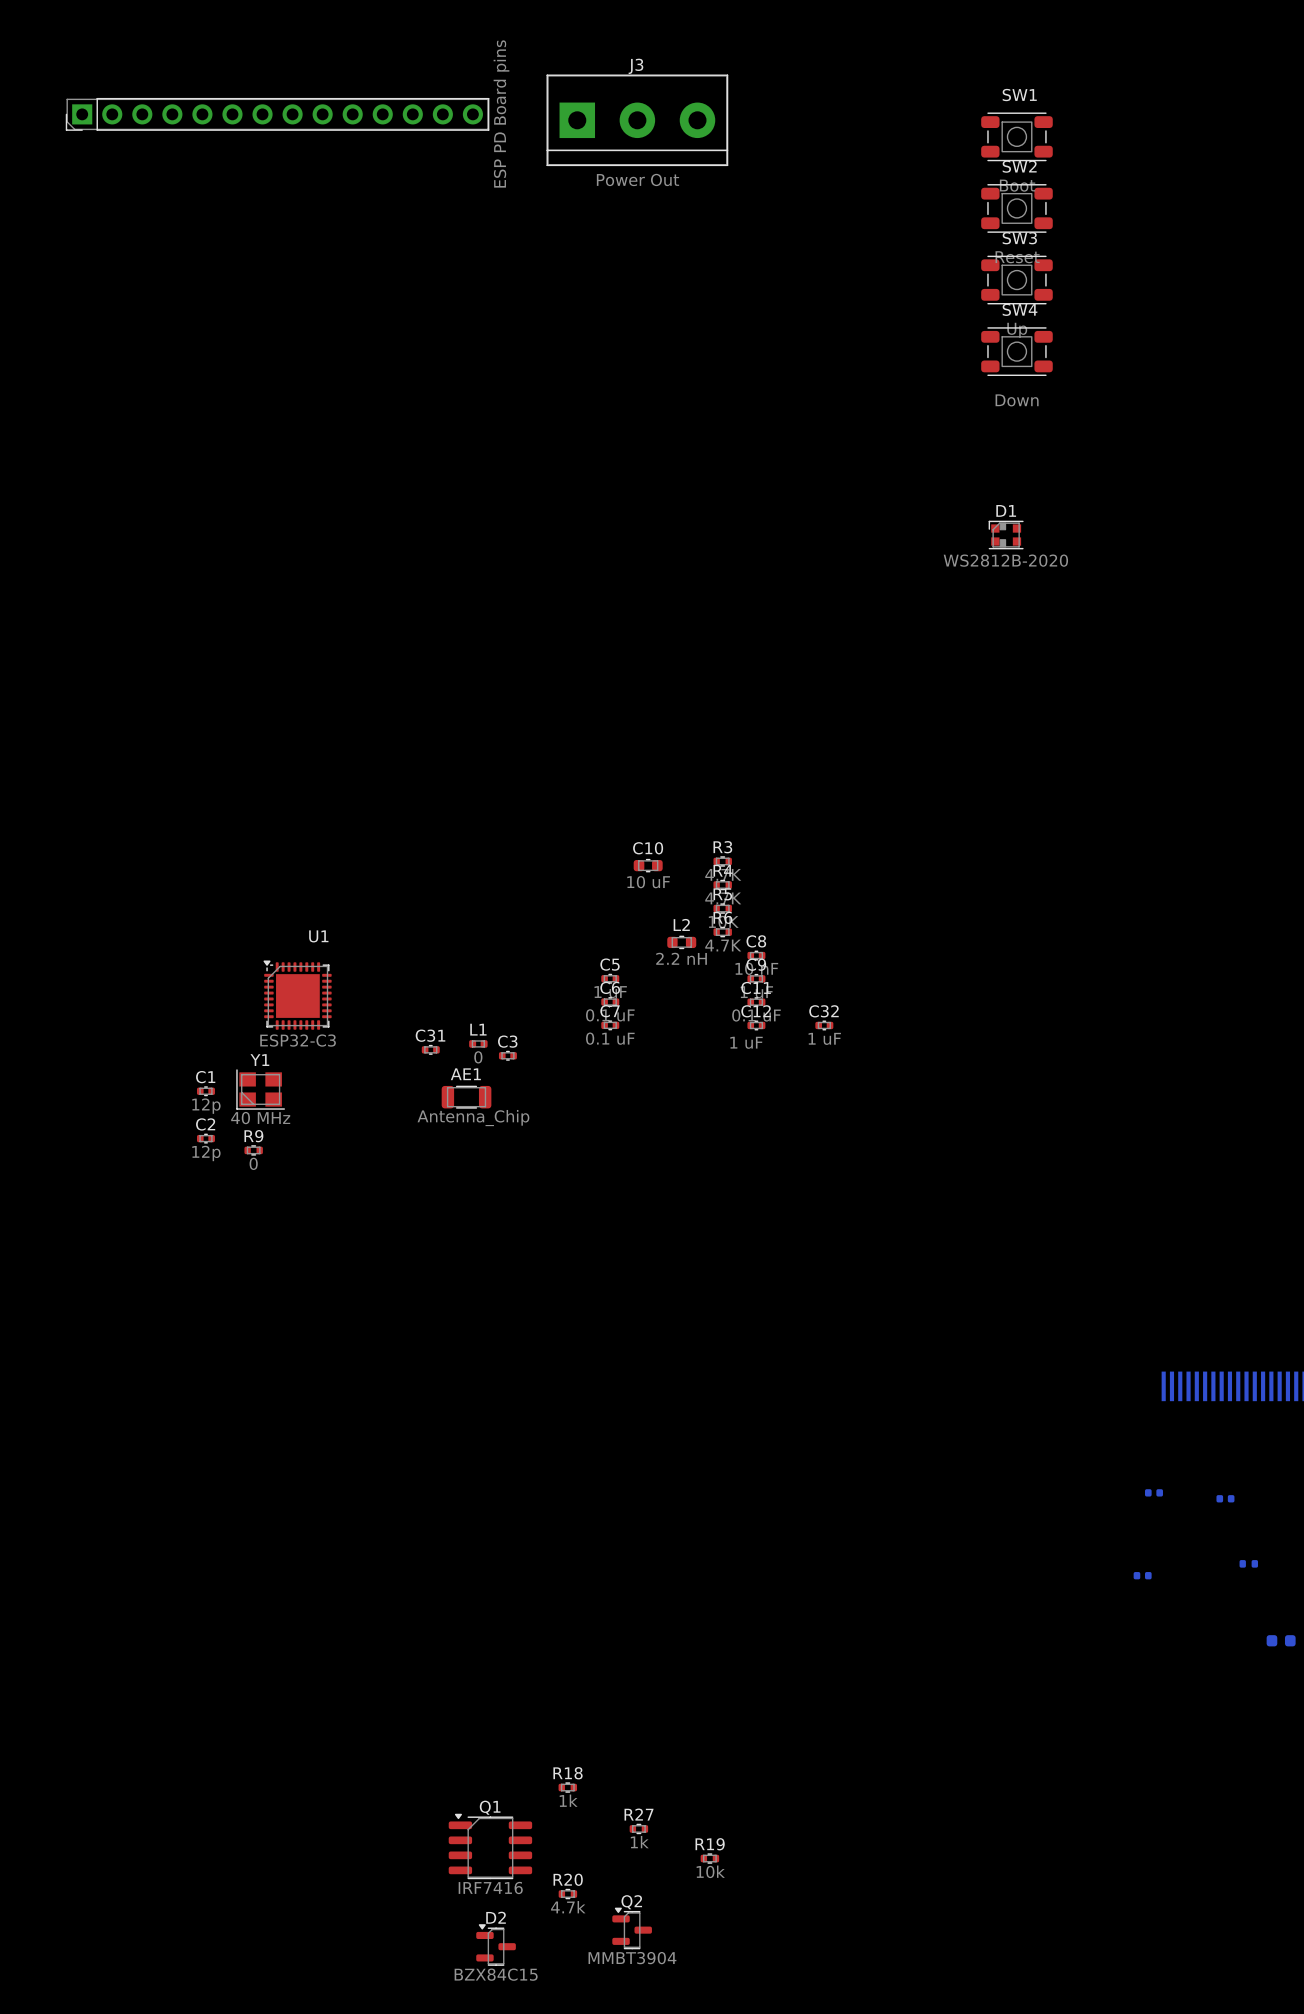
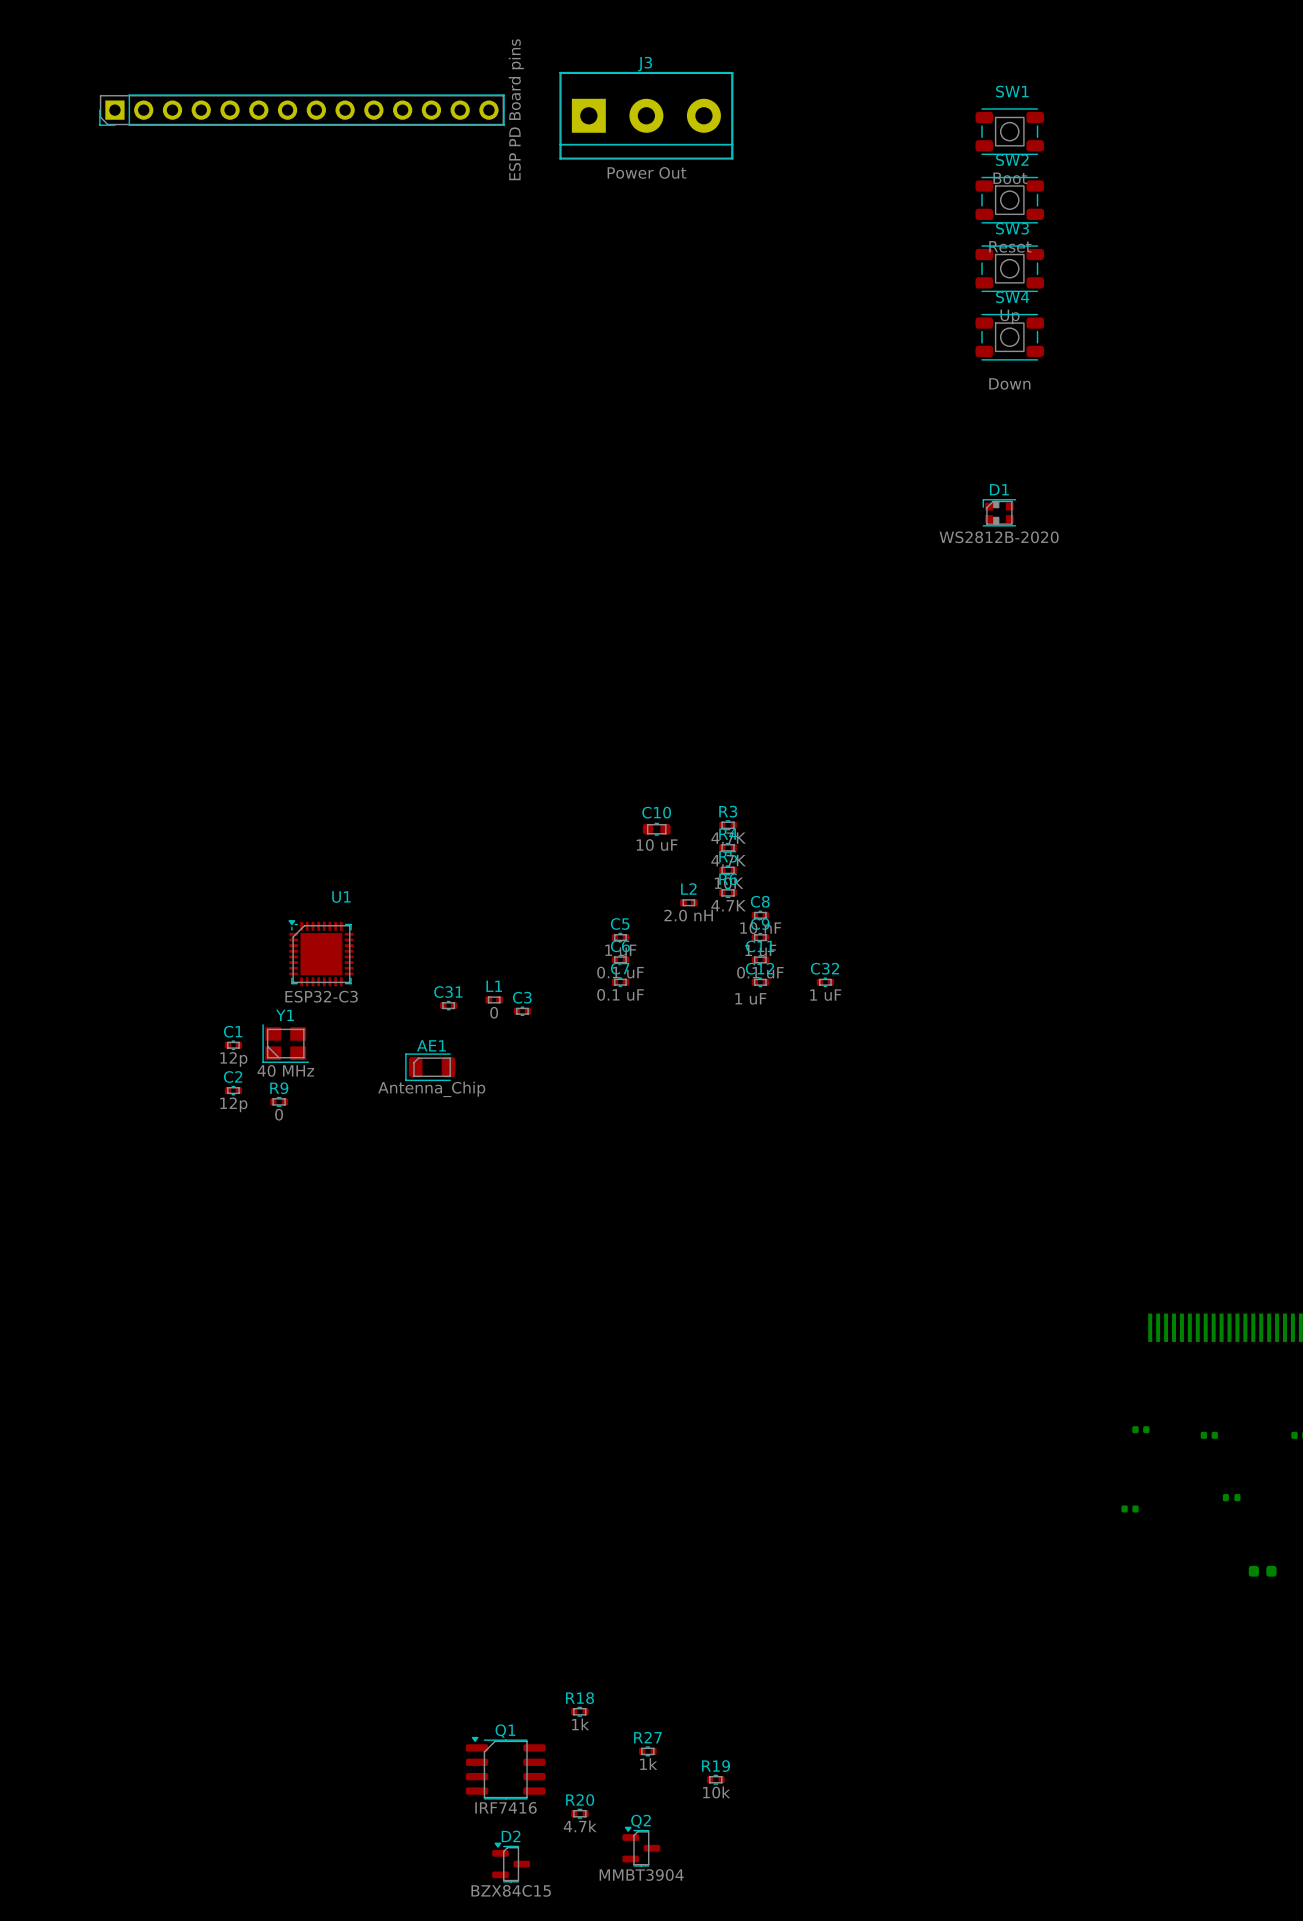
L2 footprint: [667, 935, 697, 950] -> [680, 899, 698, 907]
L2 value: 2.2 nH (681, 958) -> 2.0 nH (688, 915)
AE1 footprint: [441, 1085, 492, 1109] -> [405, 1053, 456, 1082]

